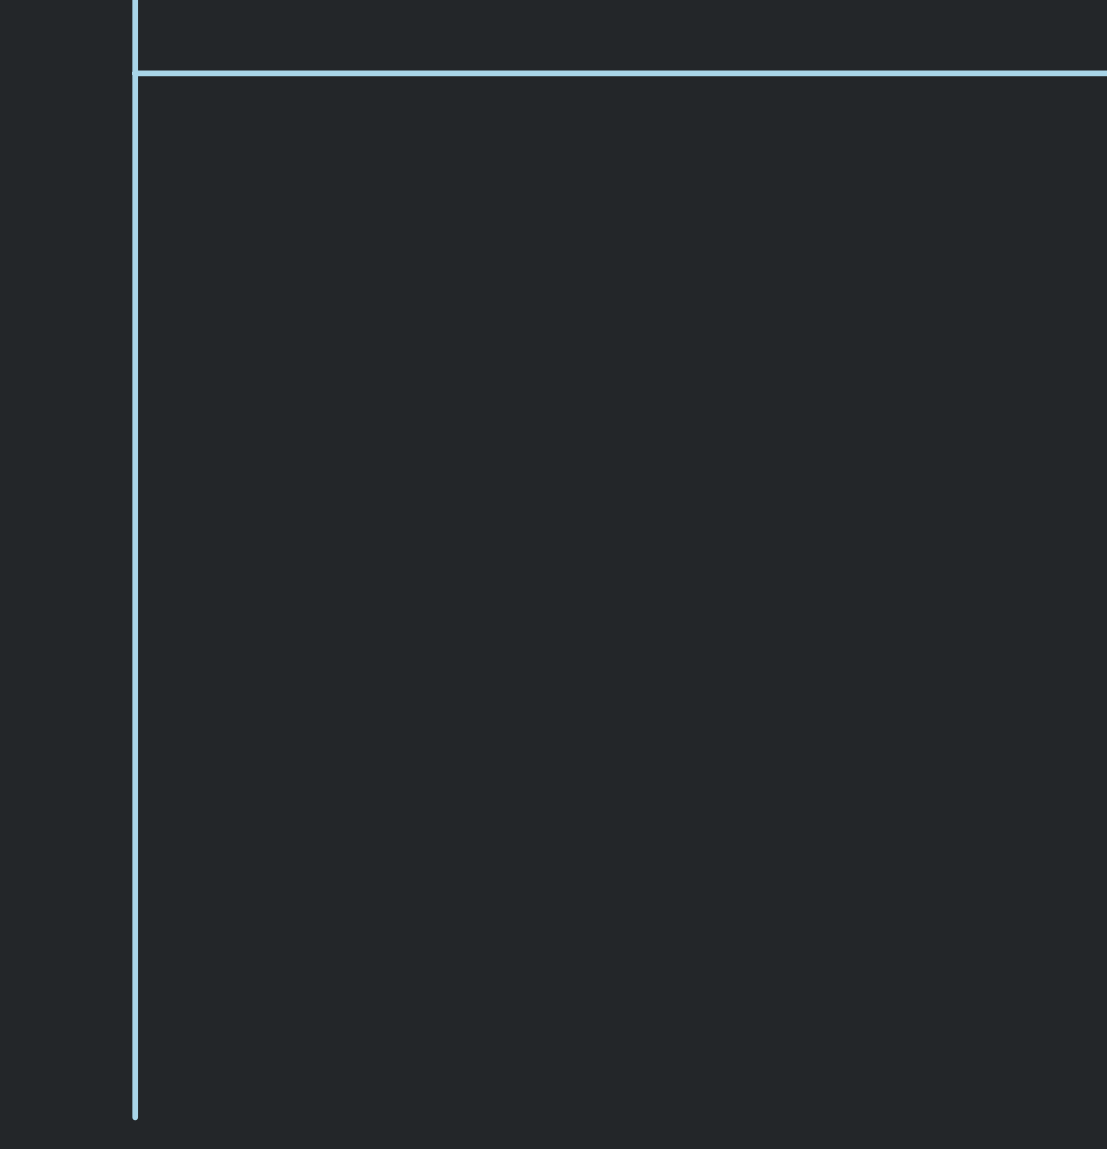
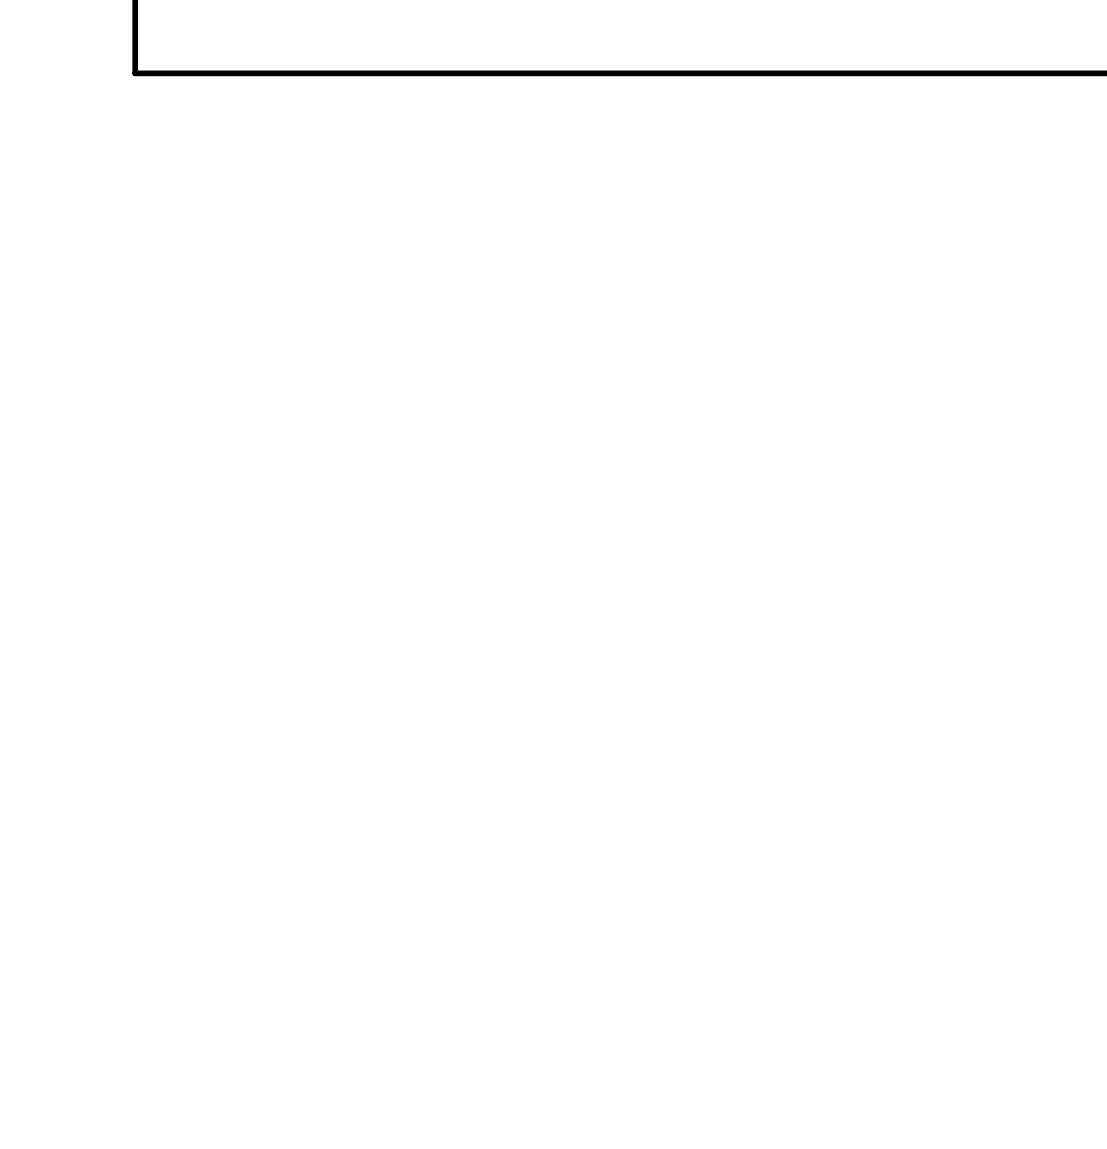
line: (135, 73) (135, 1117) -> none

